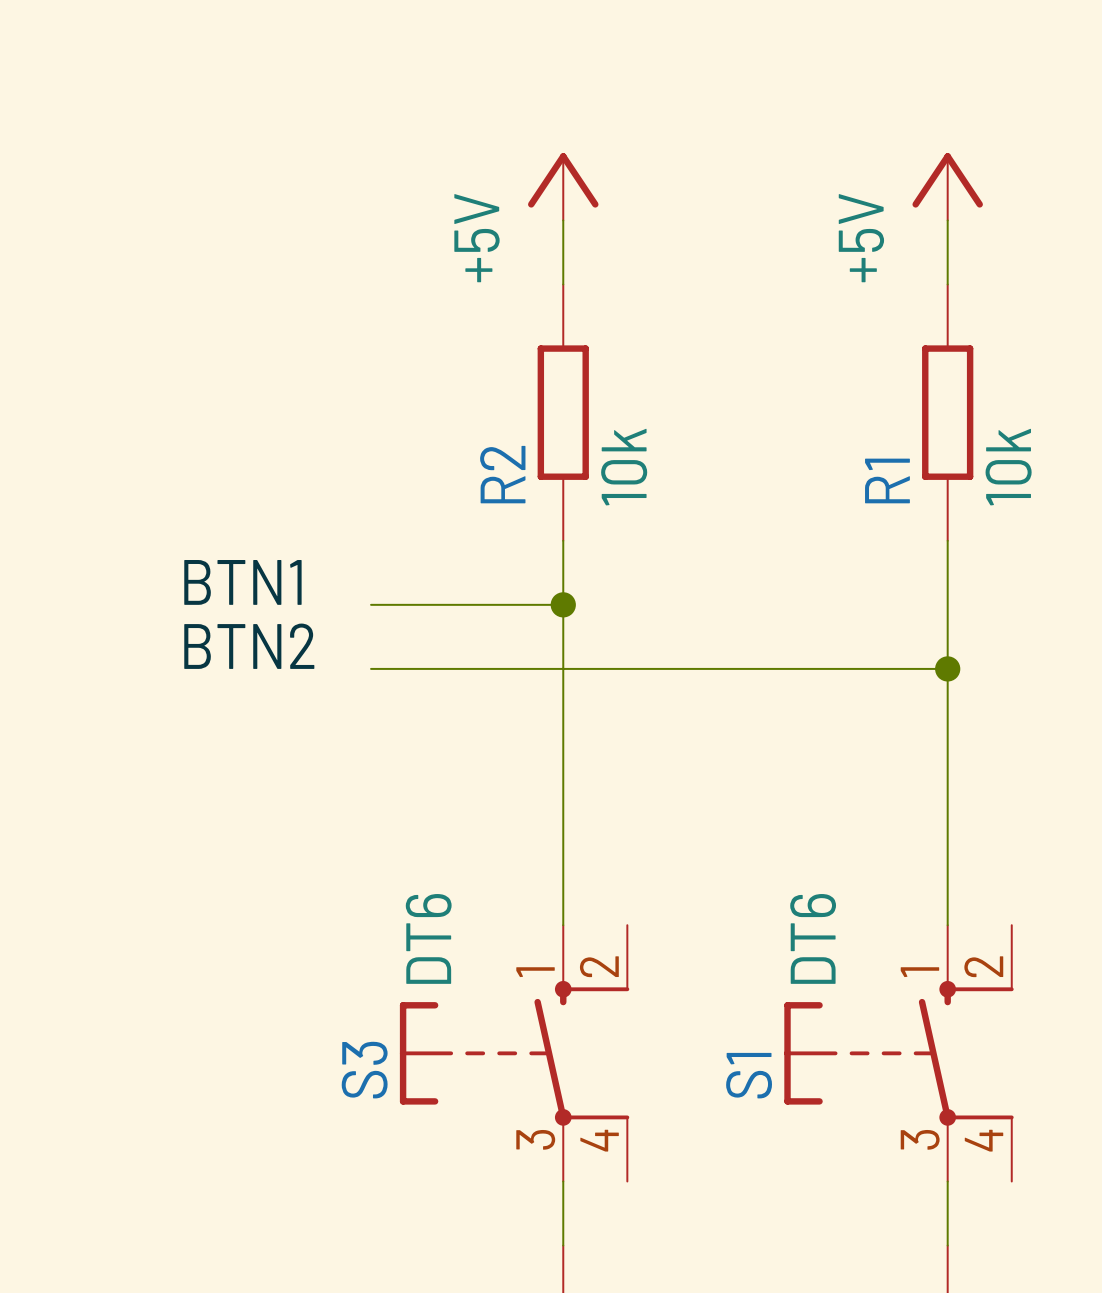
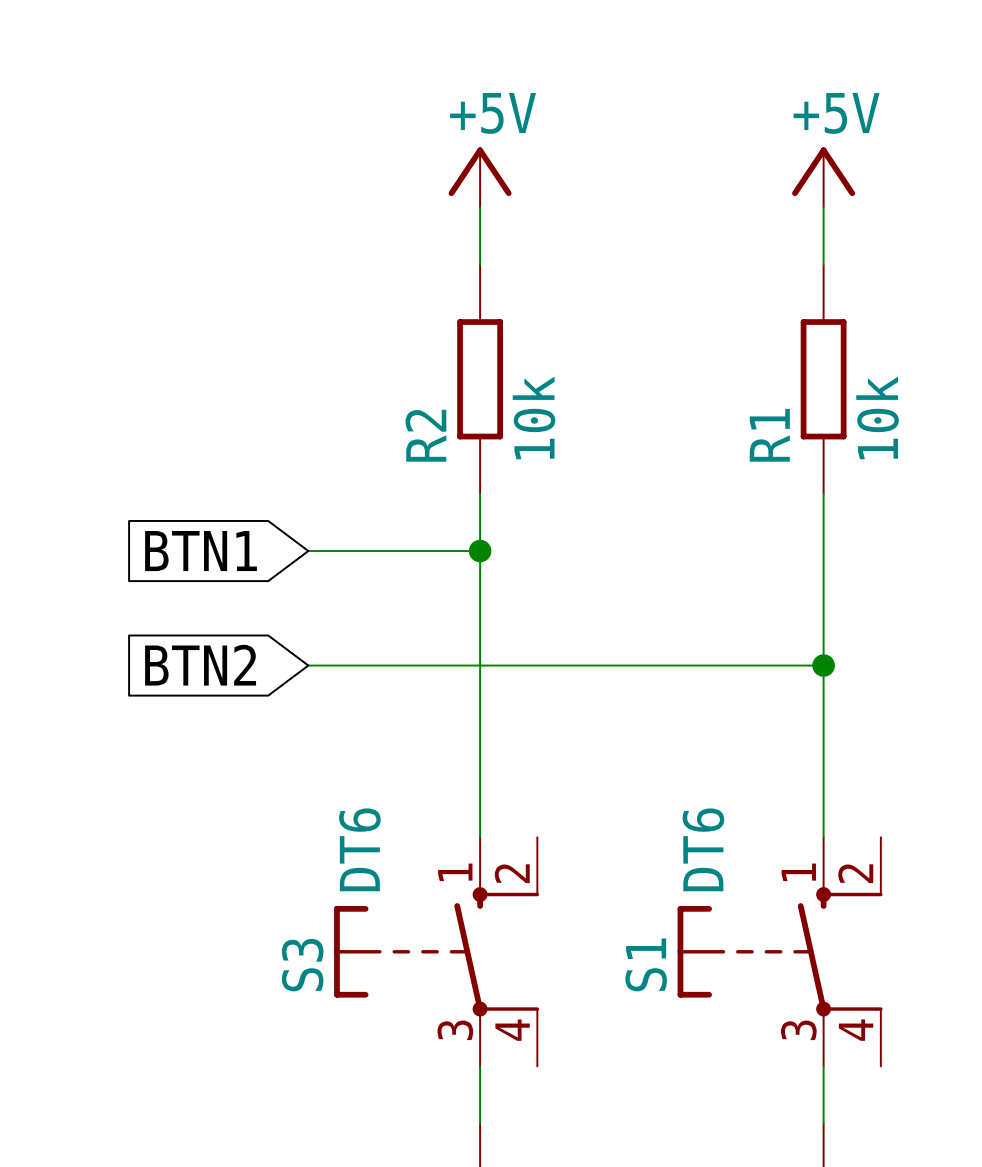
power symbol text rotation: 0° (476, 238) -> 90° clockwise (493, 113)
power symbol text rotation: 0° (861, 238) -> 90° clockwise (836, 113)
label: BTN1 (242, 582) -> none
global label: none -> BTN1 (201, 551)
label: BTN2 (249, 646) -> none
wire: (371, 668) (947, 668) -> (308, 665) (823, 665)
junction position: (947, 668) -> (823, 665)
global label: none -> BTN2 (200, 665)

